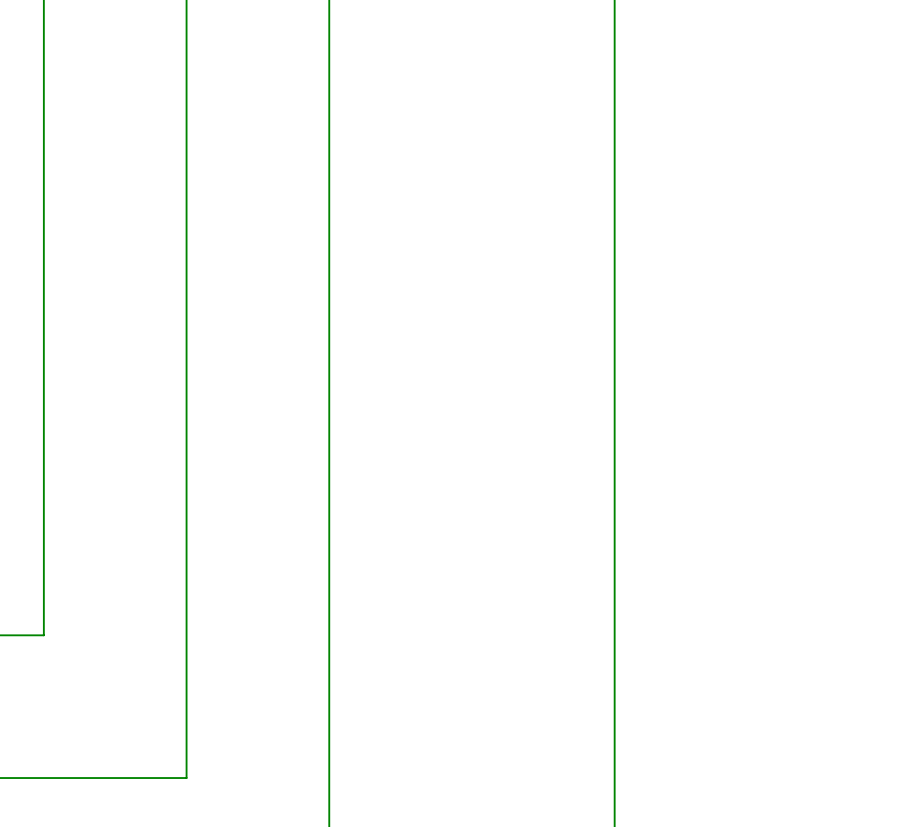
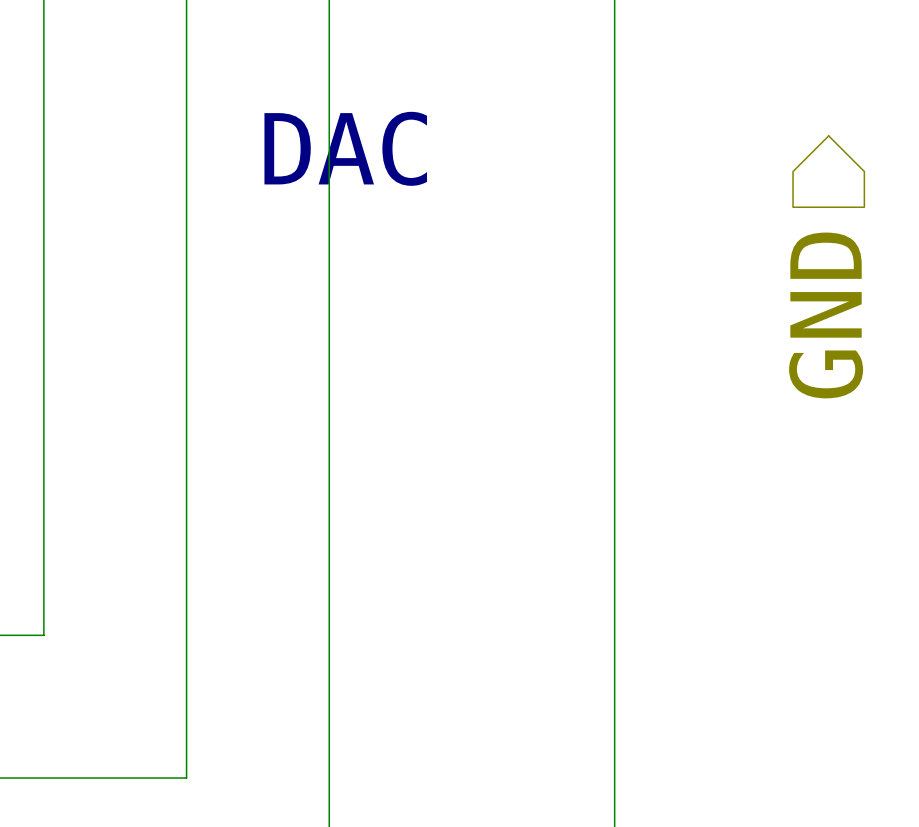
text: none -> DAC (345, 148)
hierarchical label: none -> GND (826, 315)

